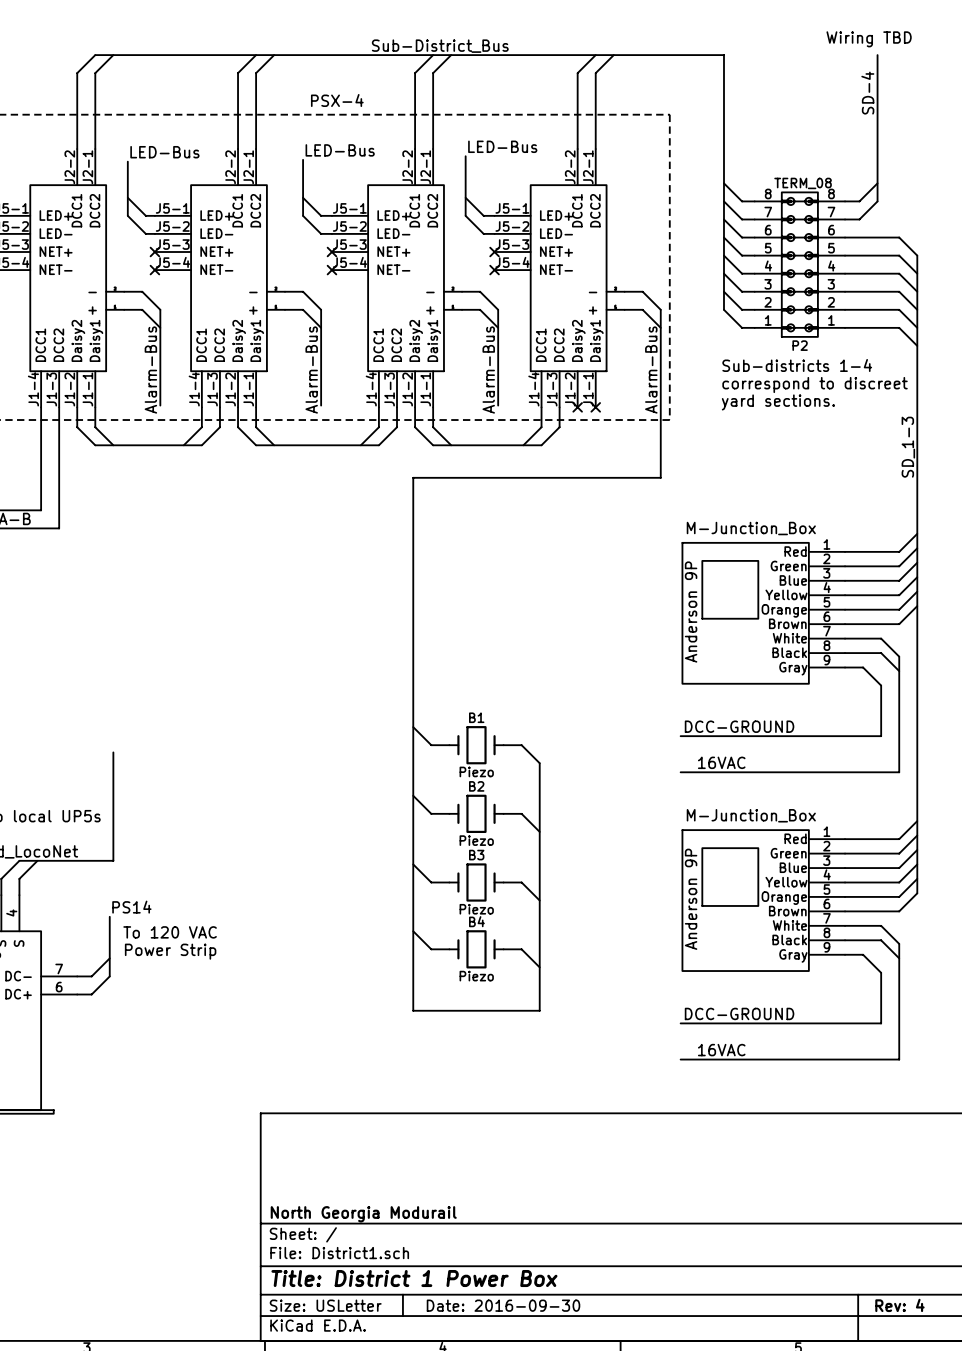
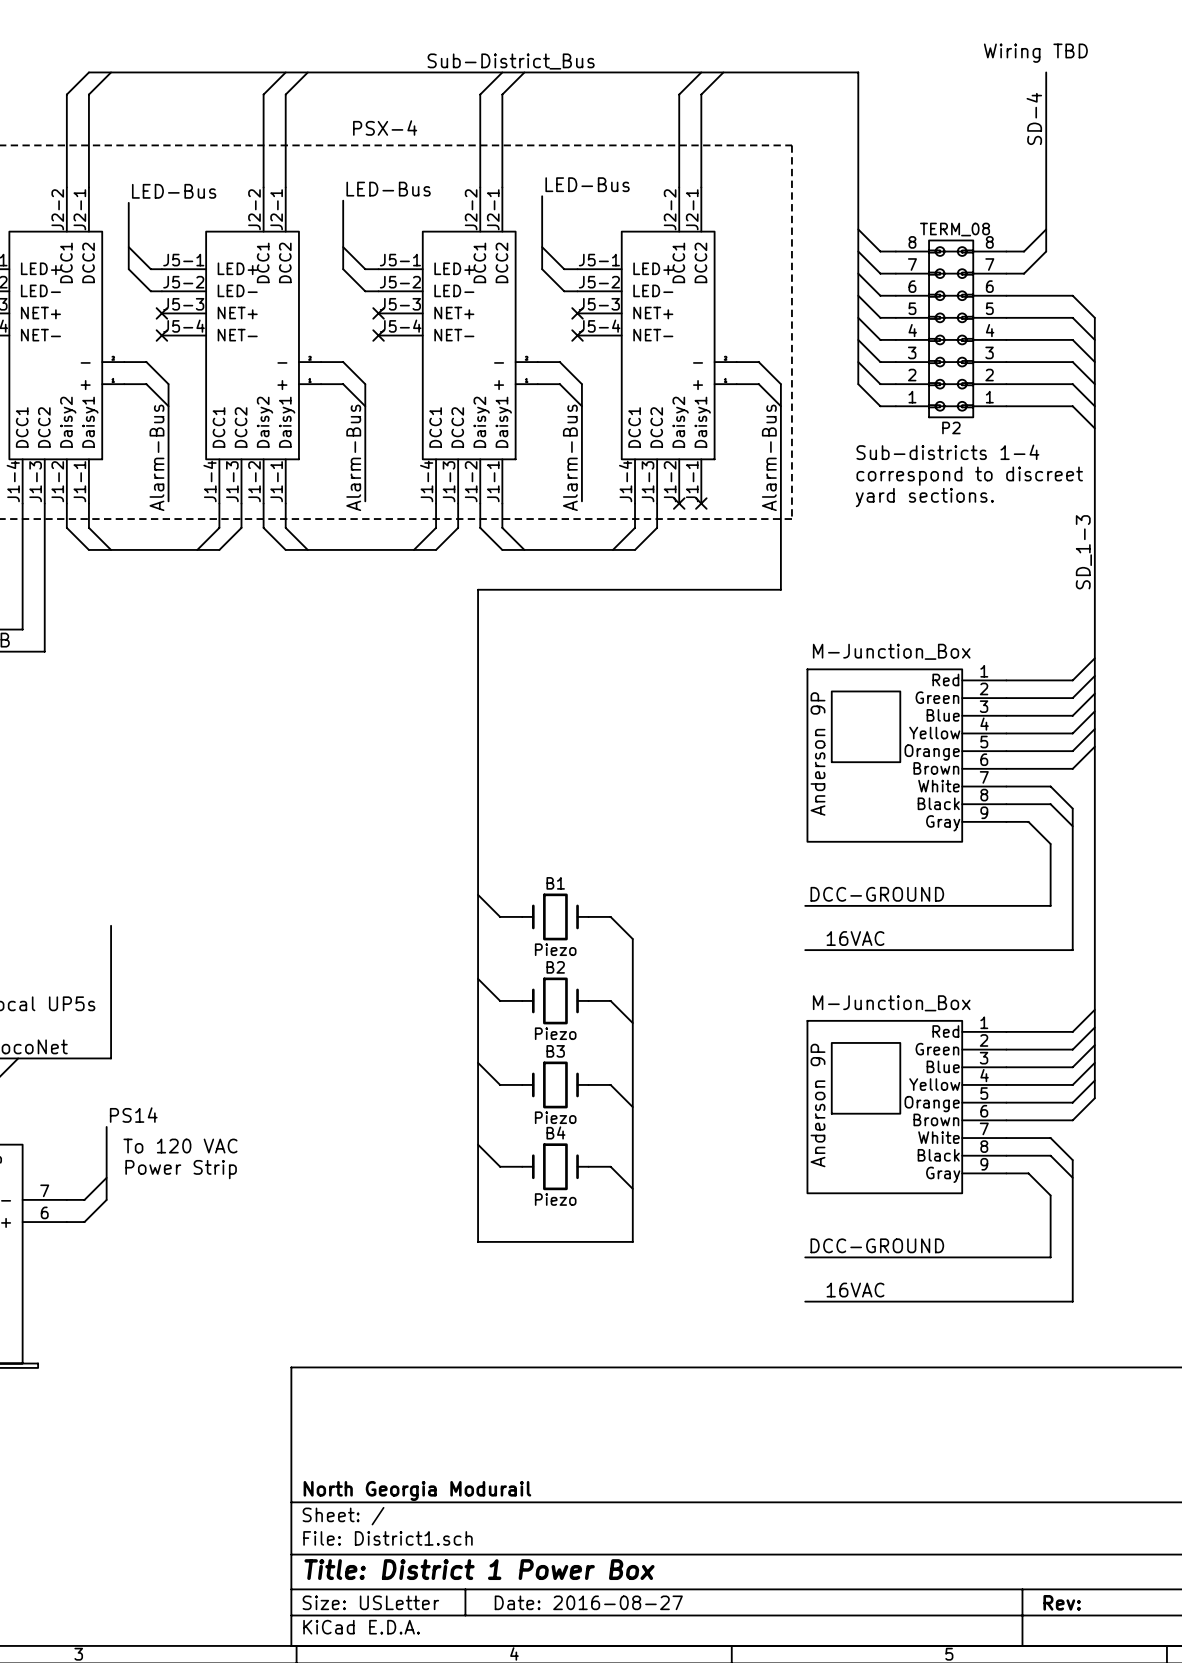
title block: Date: 2016-09-30 (503, 1305) -> Date: 2016-08-27 (588, 1602)
title block: Rev: 4 (899, 1305) -> Rev: (1062, 1602)

